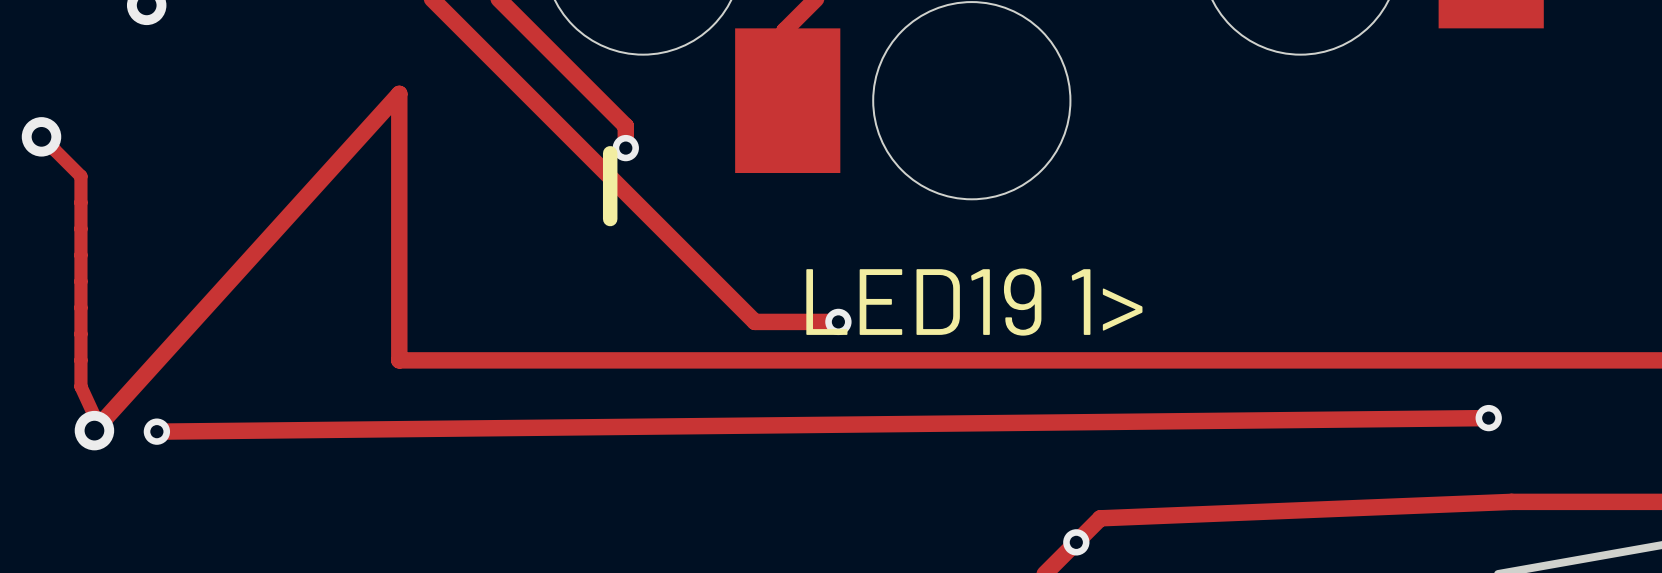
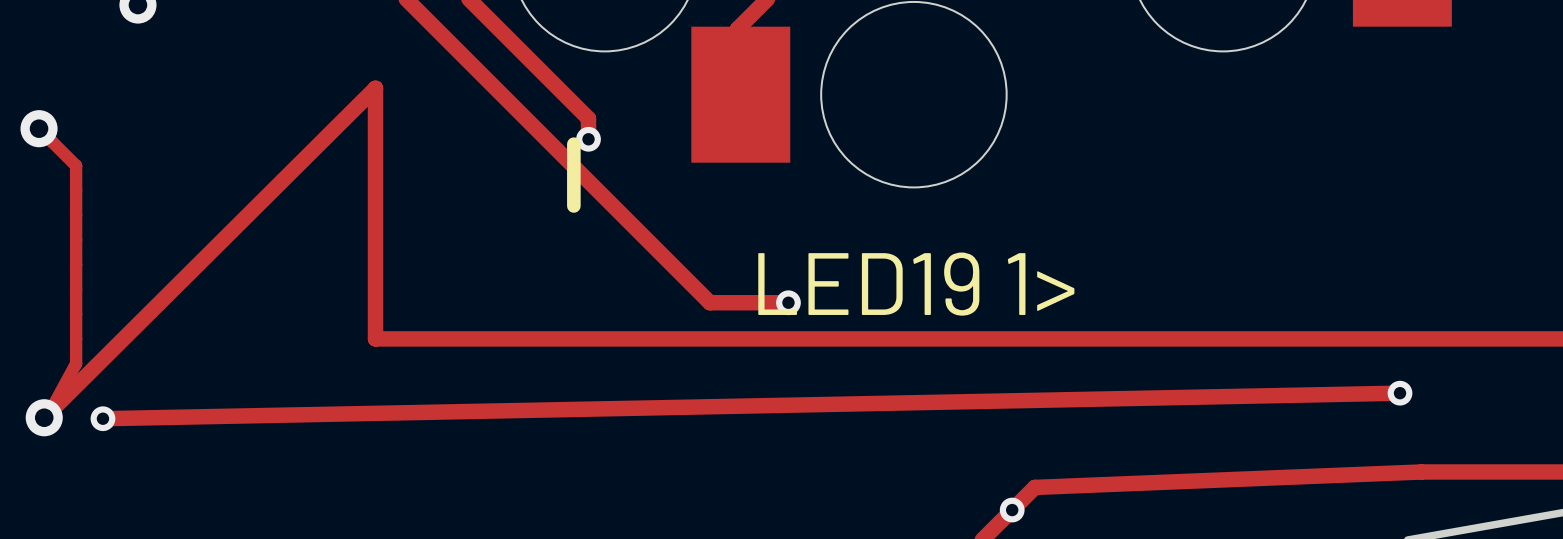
track: (399, 93) (94, 430) (99, 426) (80, 386) -> (375, 88) (44, 417) (48, 413) (76, 363)
track: (1488, 418) (156, 431) -> (1400, 393) (102, 418)
via position: (94, 430) -> (44, 417)
via position: (156, 431) -> (102, 418)

